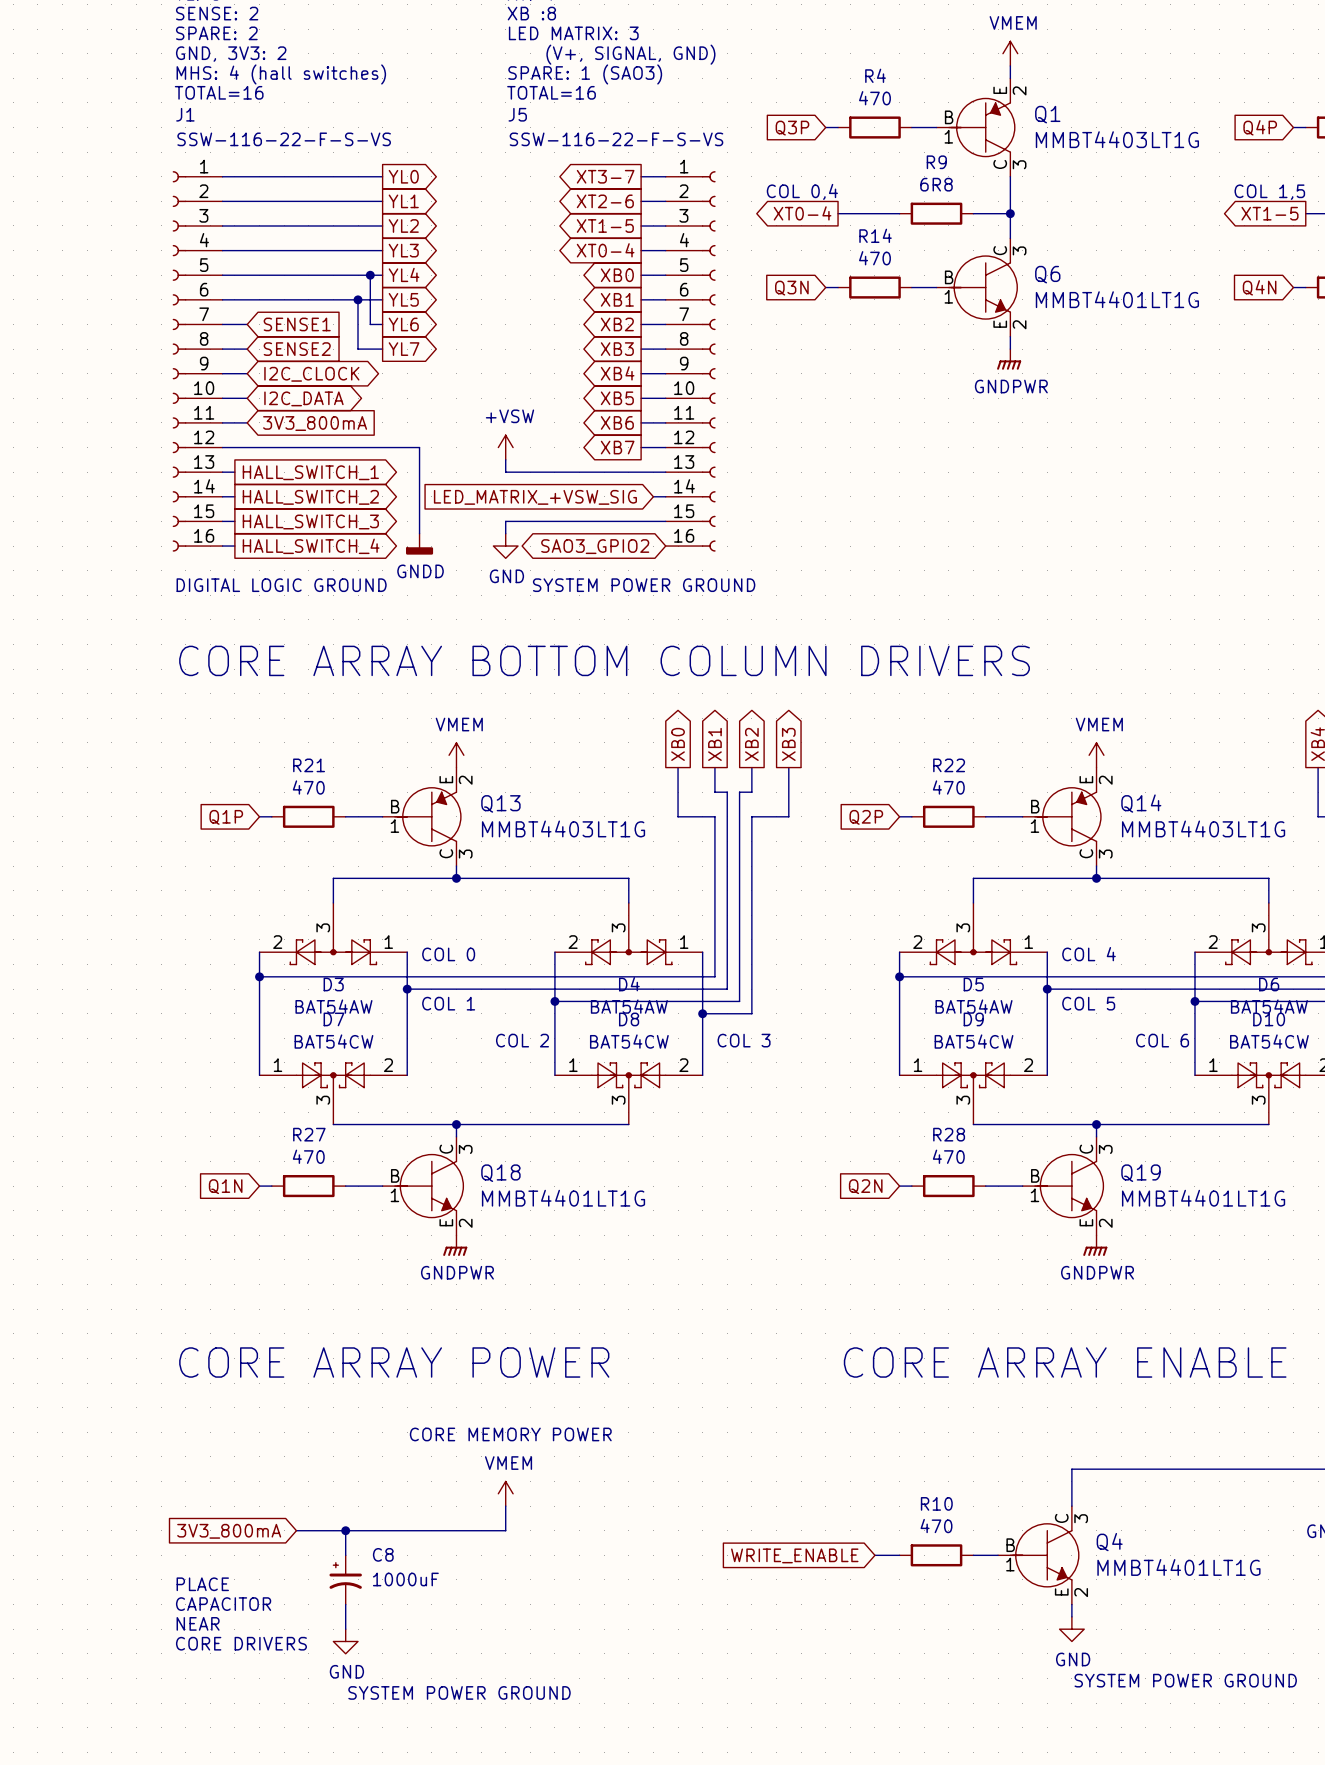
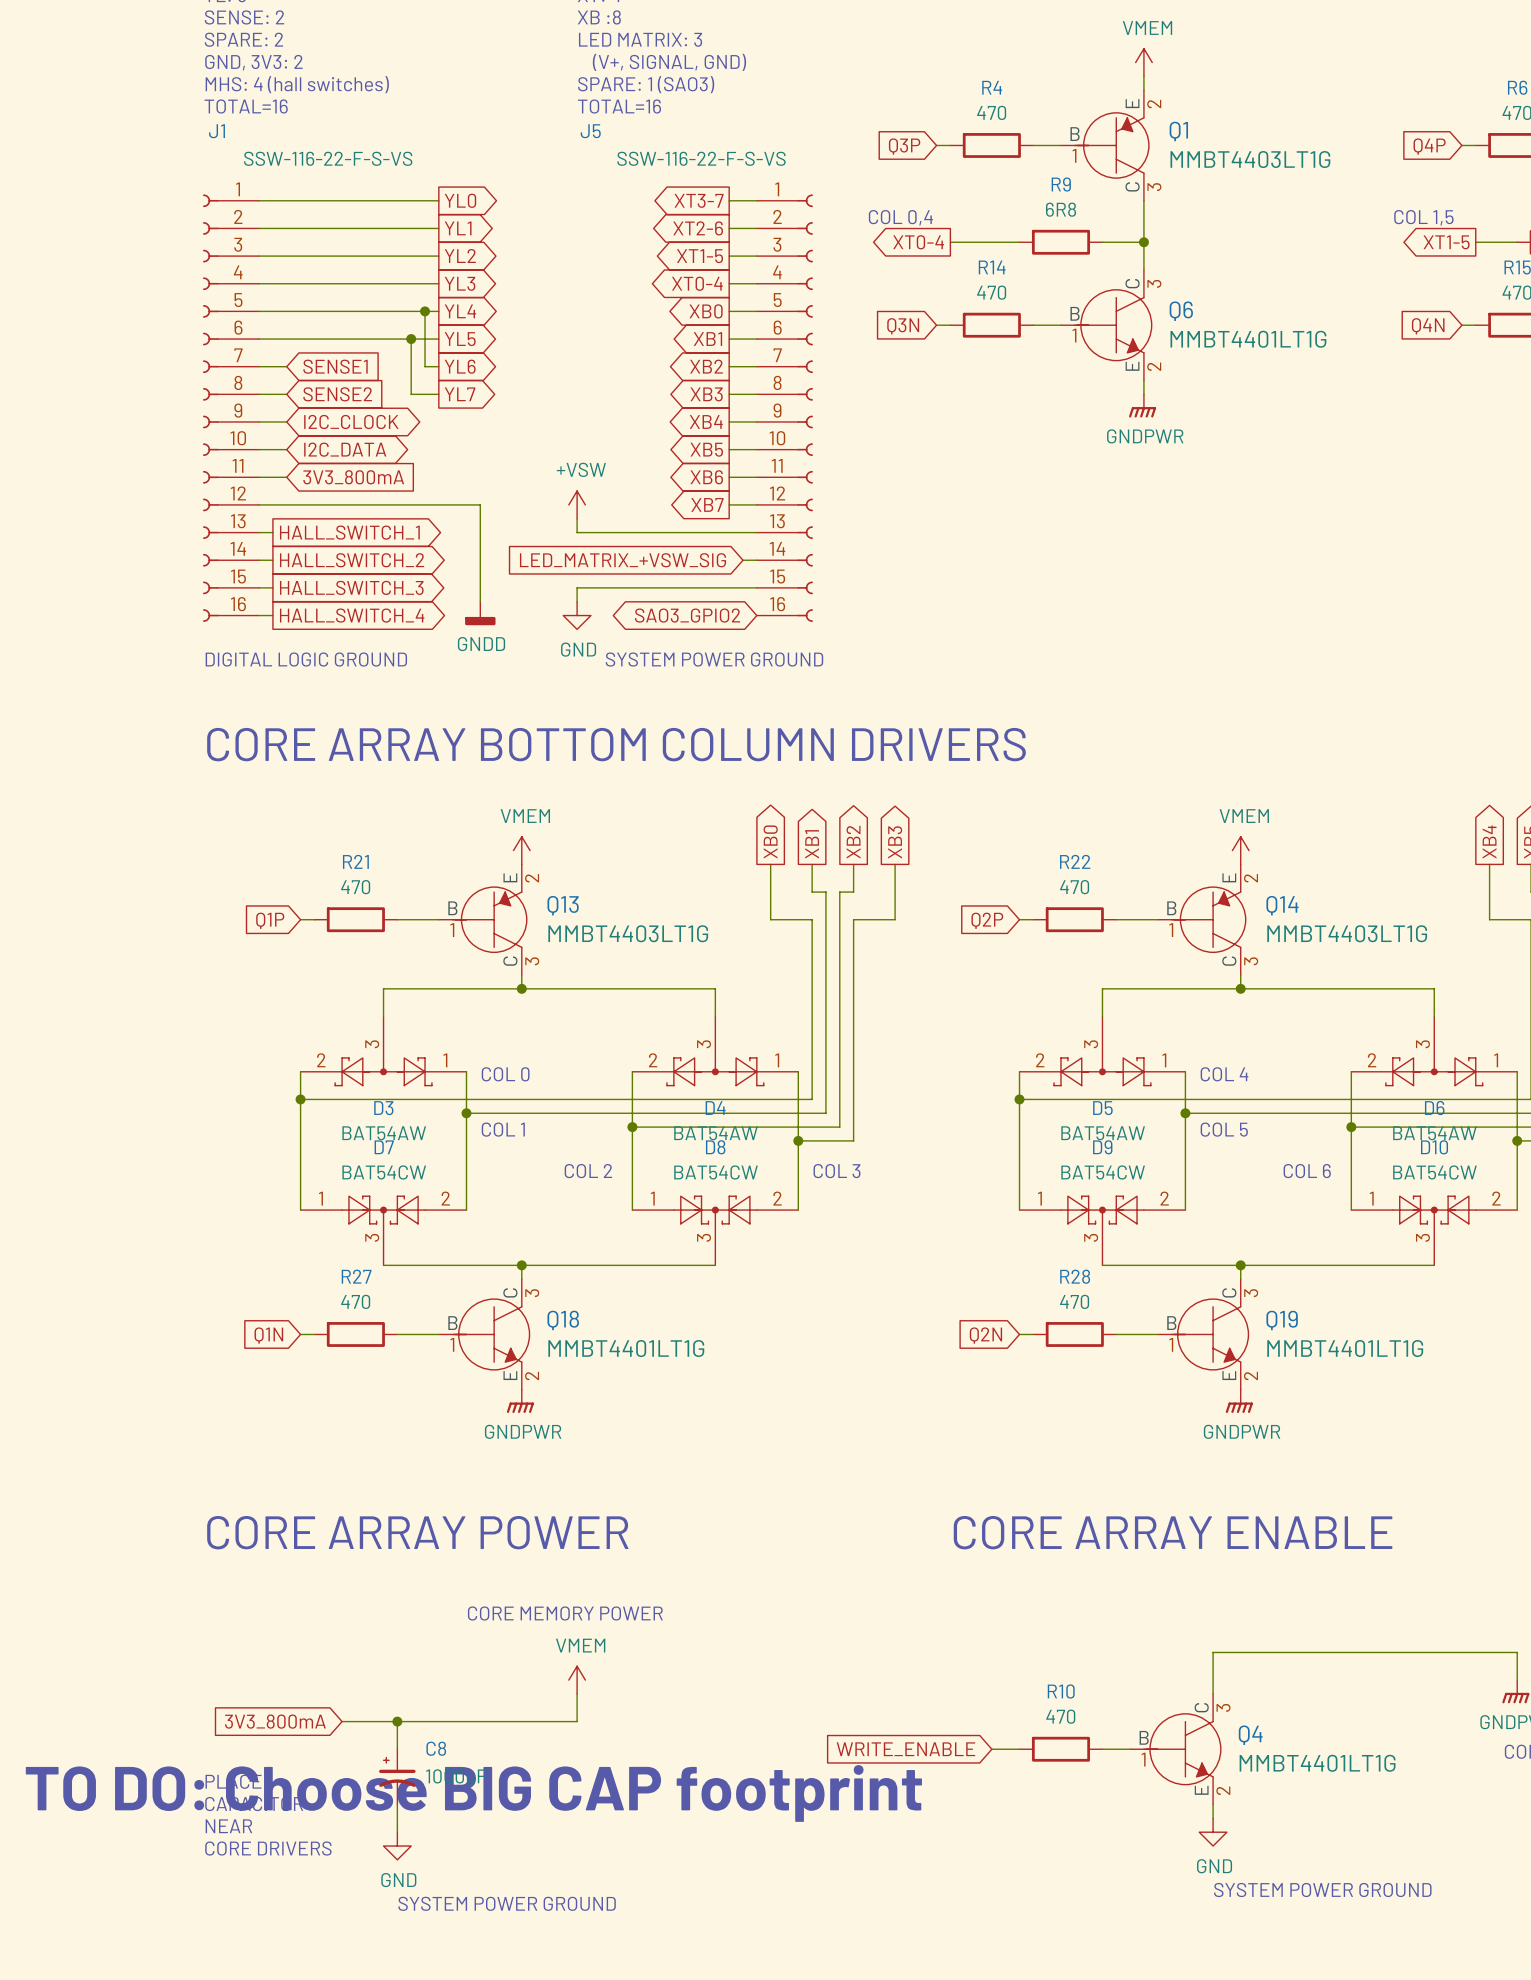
text: none -> TO DO: Choose BIG CAP footprint (473, 1793)

